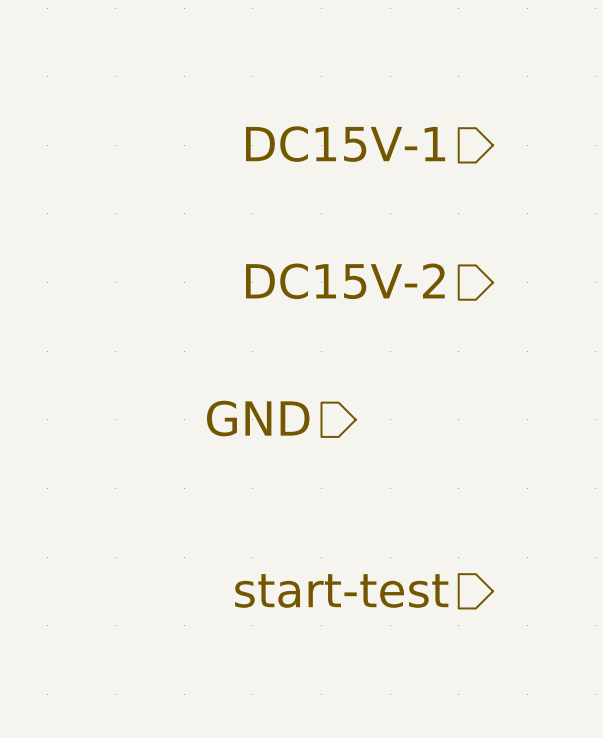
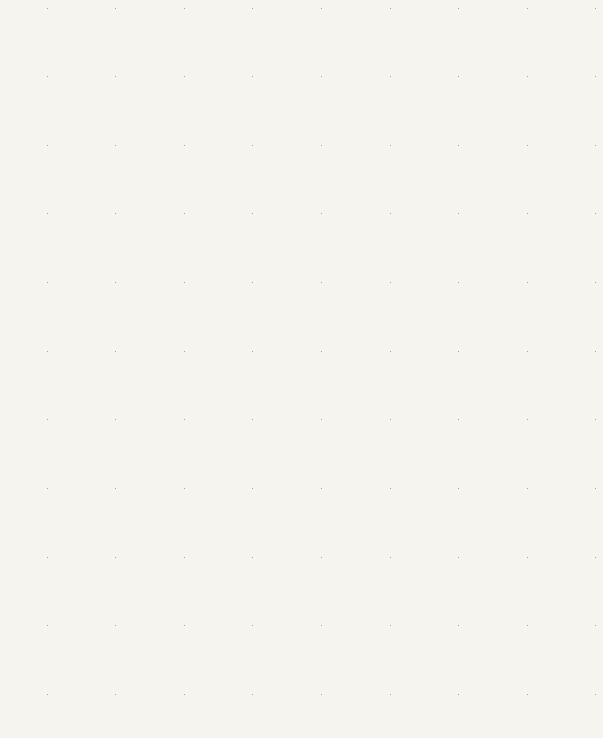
hierarchical label: DC15V-1 (345, 144) -> none
hierarchical label: DC15V-2 (345, 281) -> none
hierarchical label: GND (258, 418) -> none
hierarchical label: start-test (341, 590) -> none

